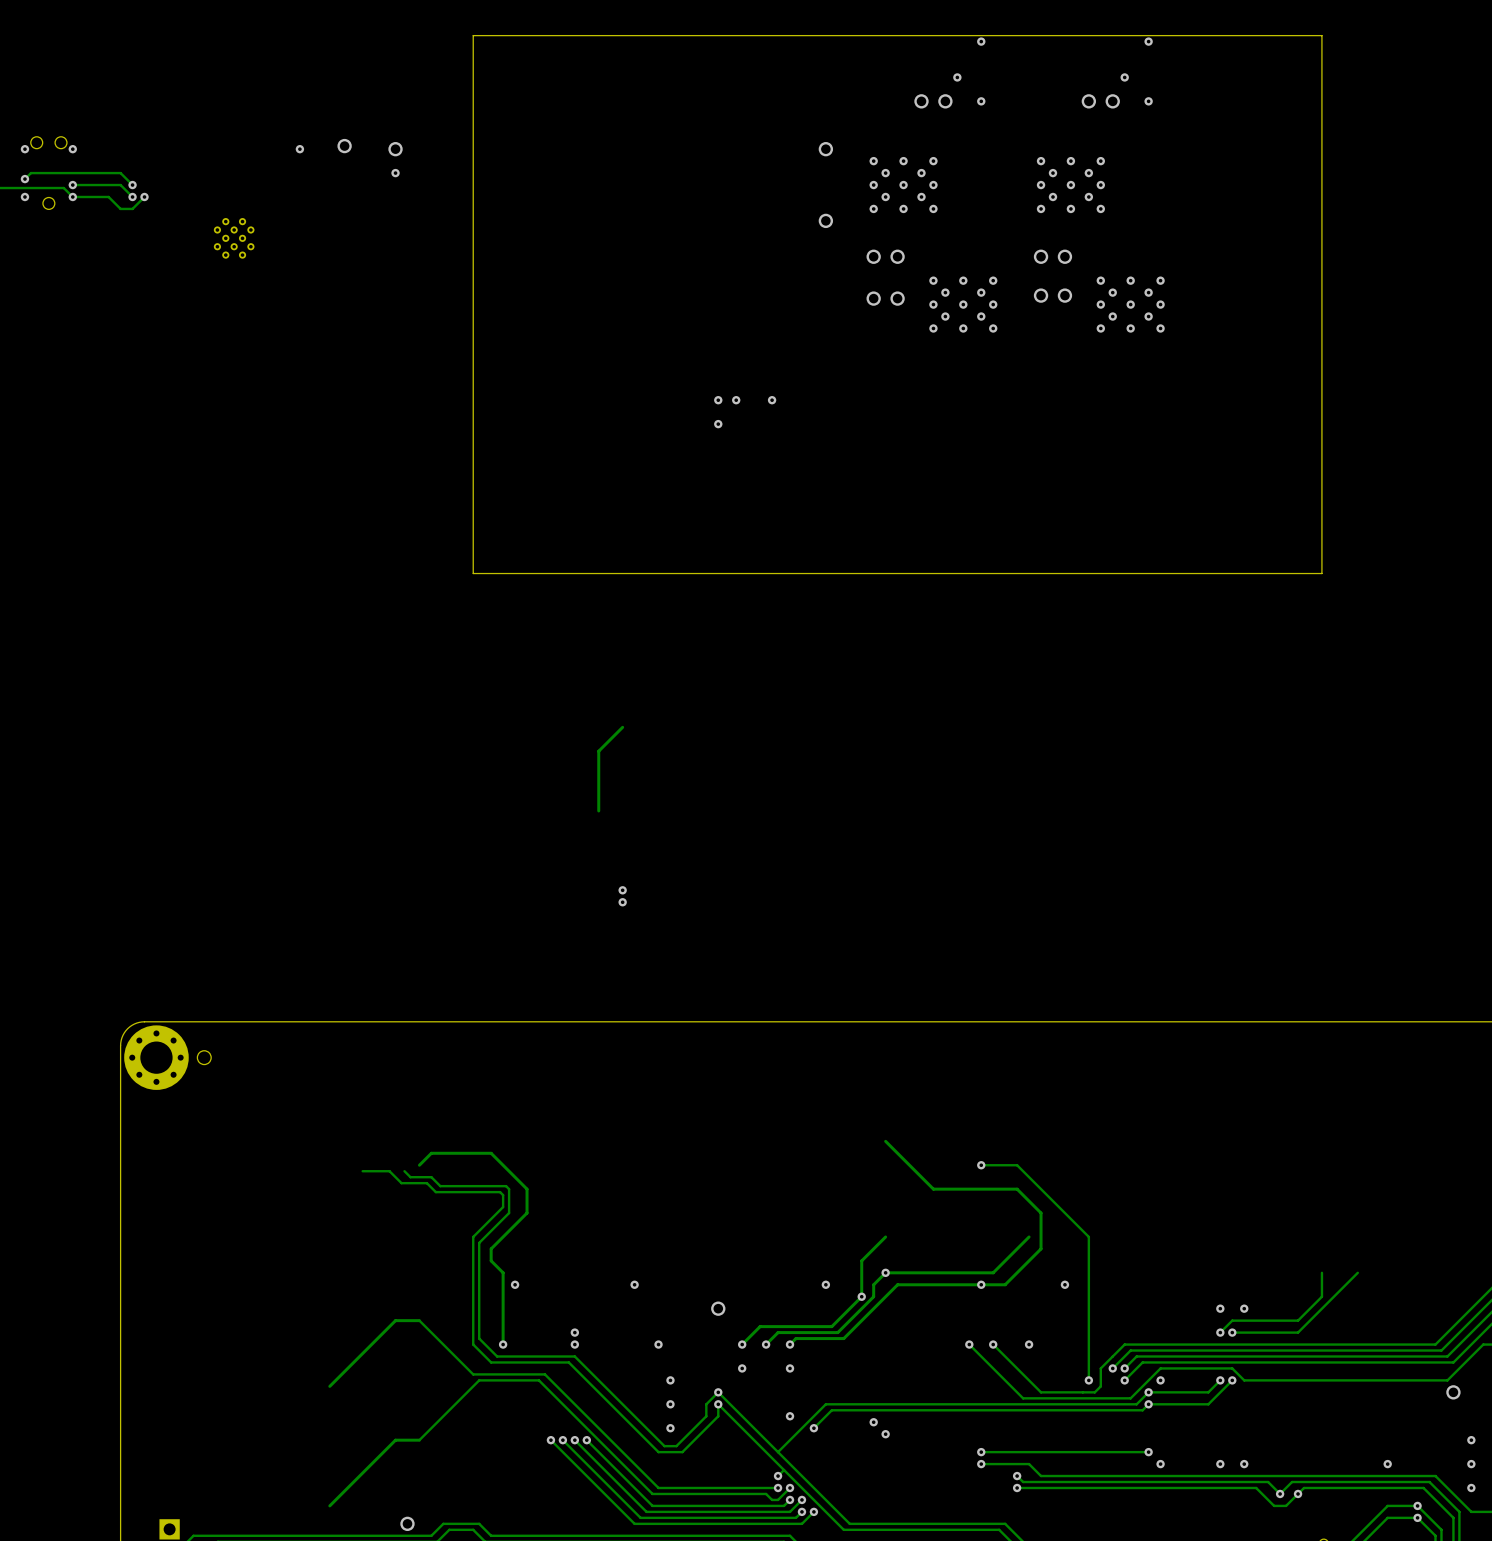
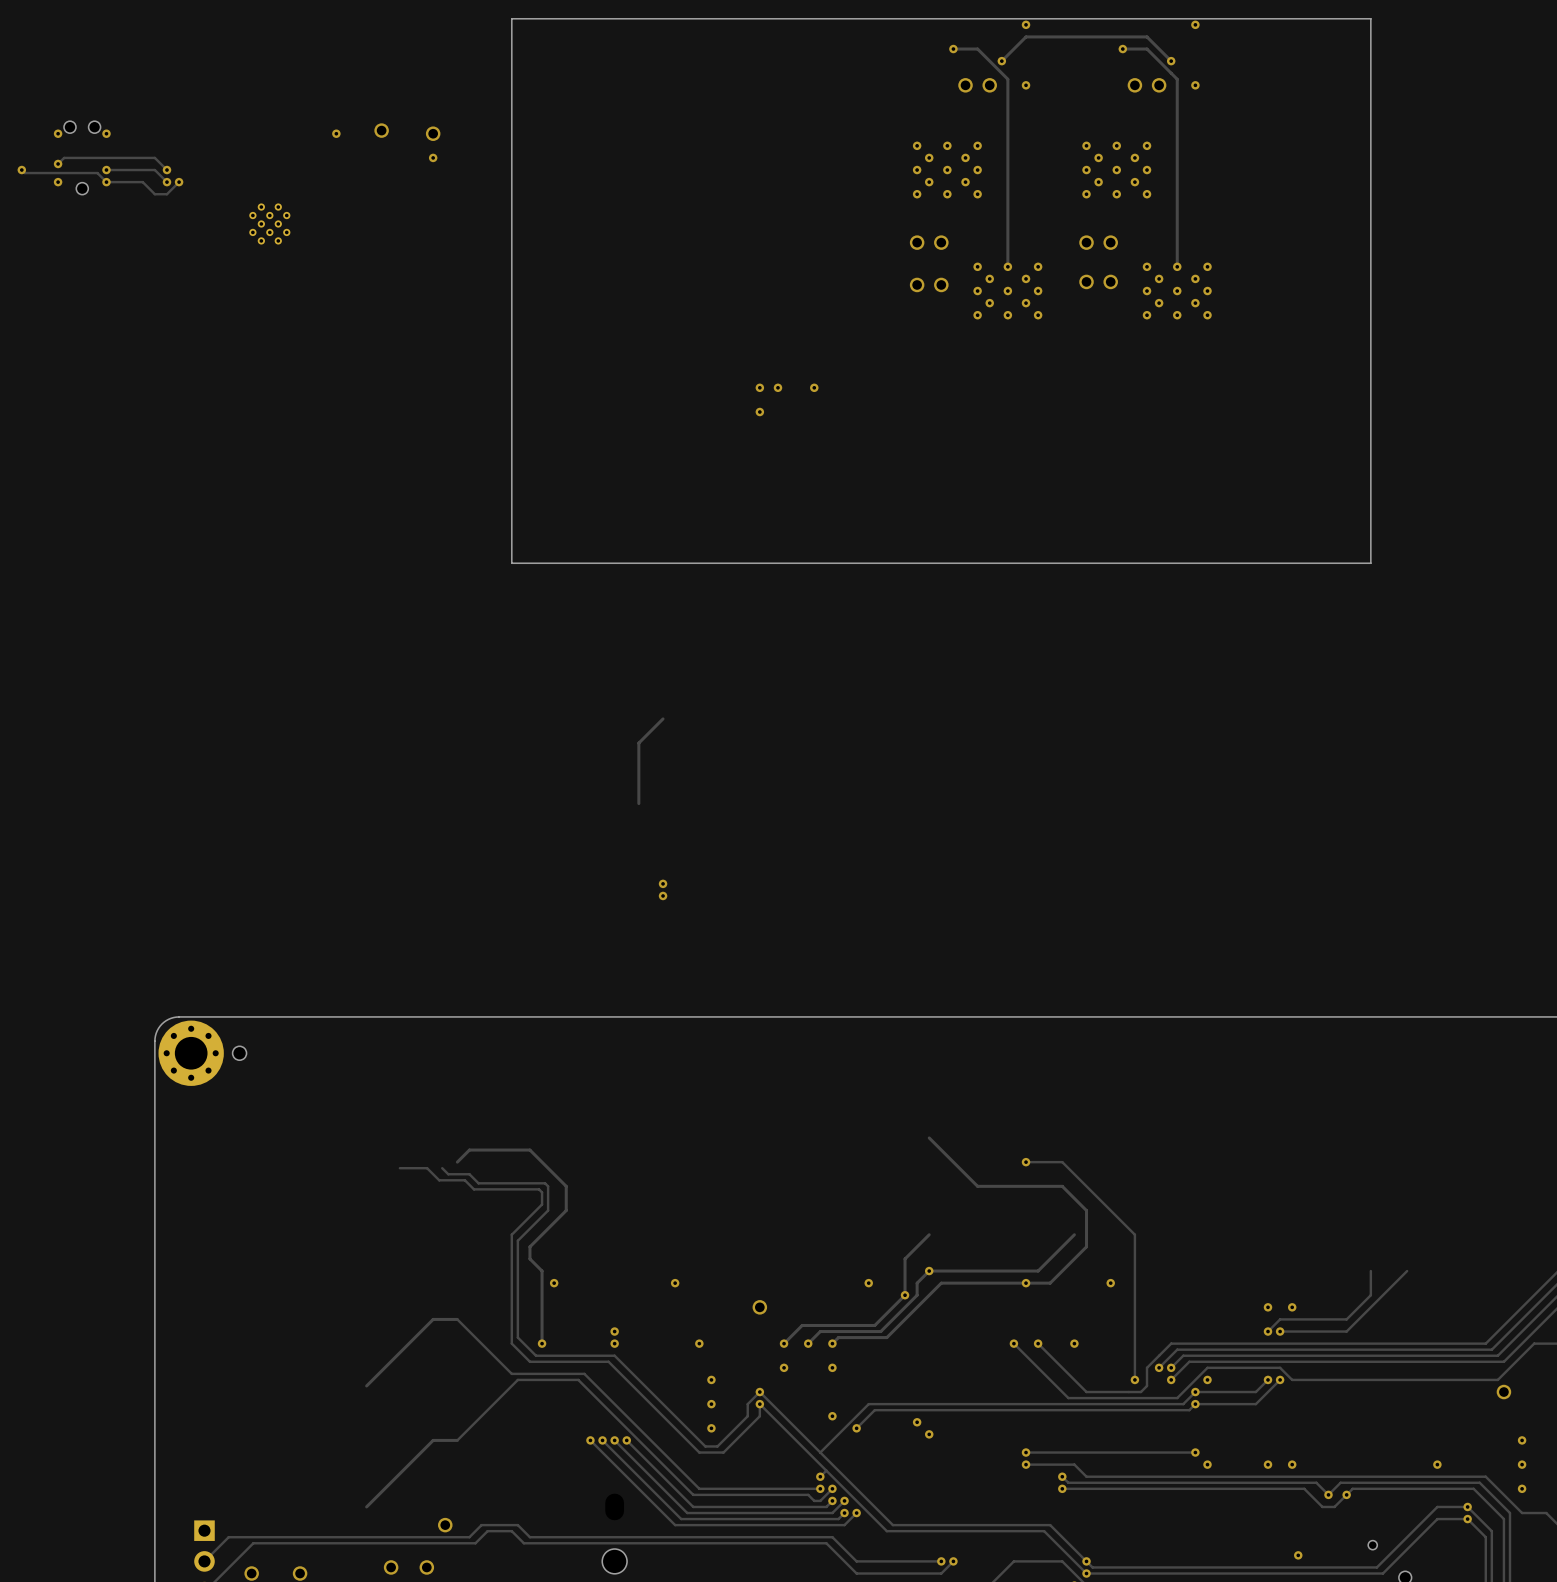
track: none -> (953, 49) (977, 49) (1007, 79) (1007, 266)
via: none -> (953, 49)
track: none -> (1122, 49) (1147, 49) (1177, 79) (1177, 266)
via: none -> (1122, 49)
track: none -> (1171, 61) (1147, 36) (1026, 36) (1001, 61)
via: (825, 149) -> none
via: (825, 220) -> none

